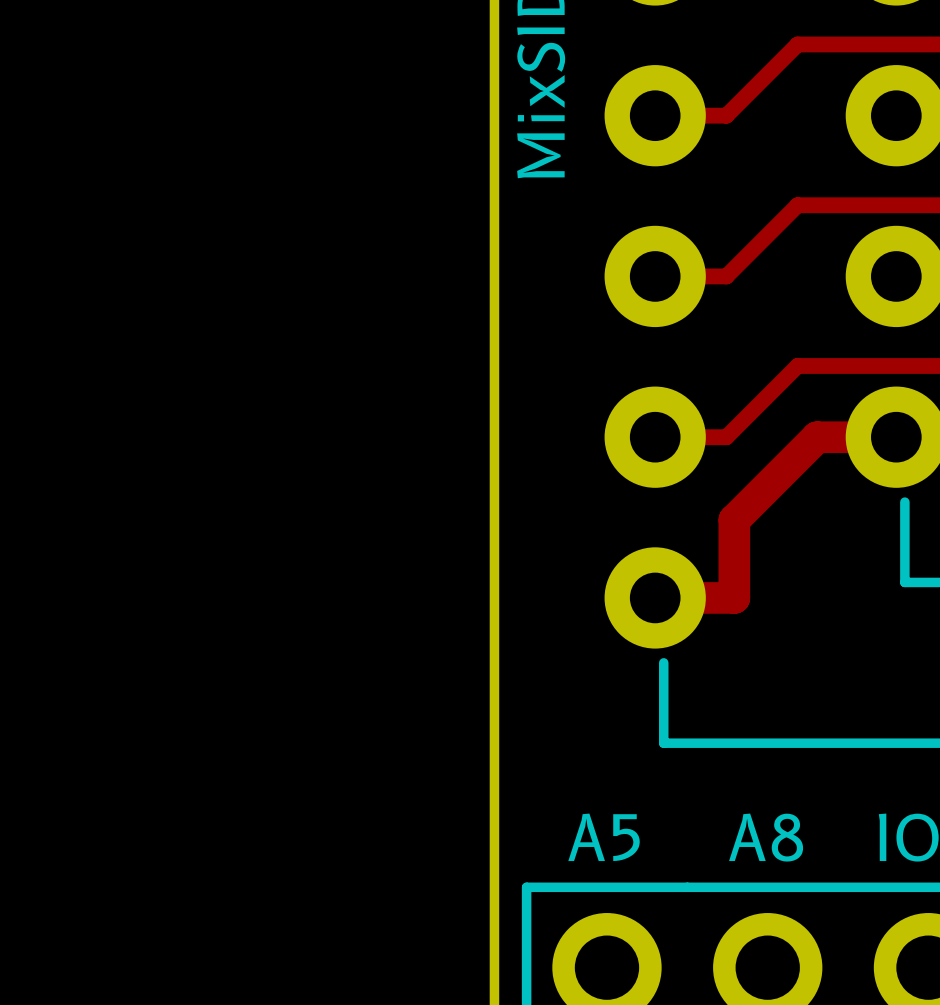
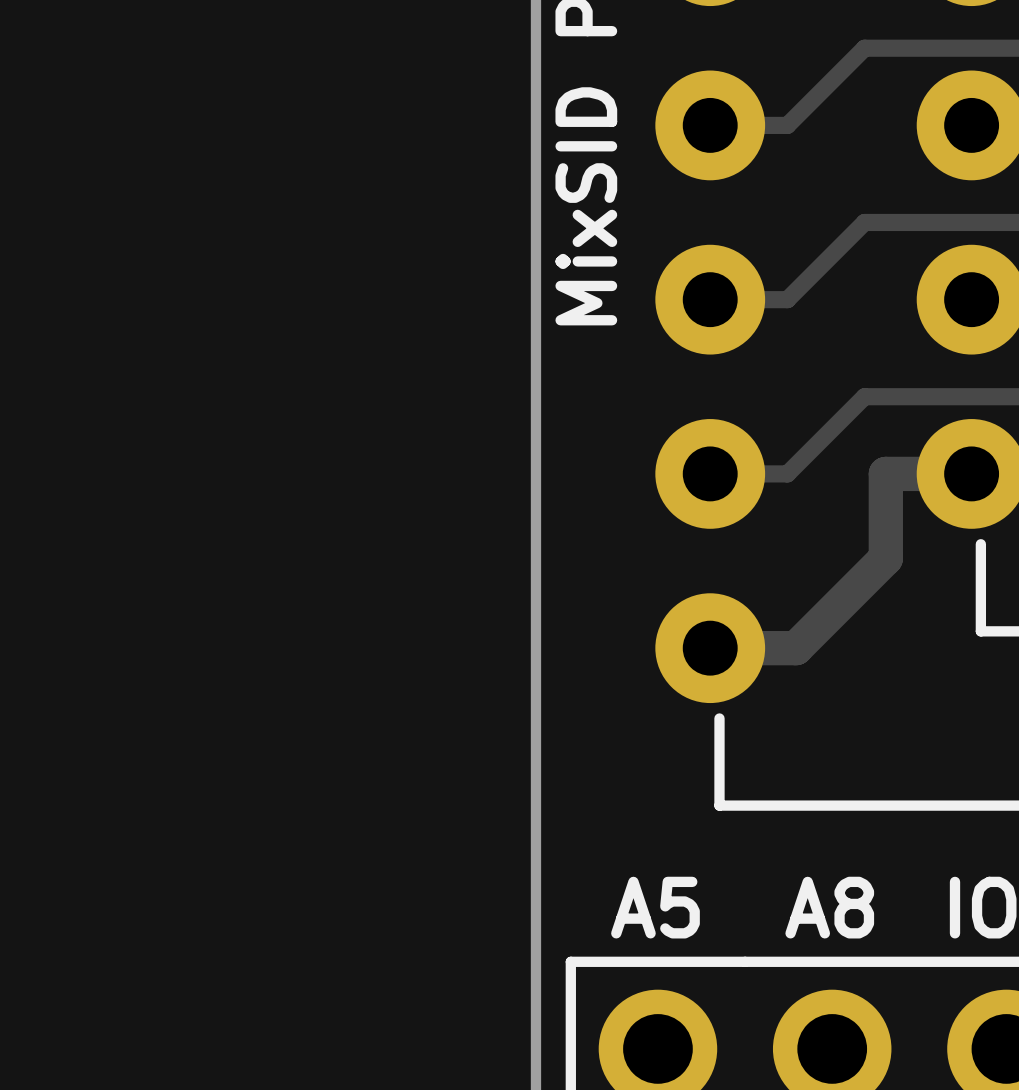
track: (817, 437) (734, 520) (734, 597) -> (885, 473) (885, 558) (796, 648)

